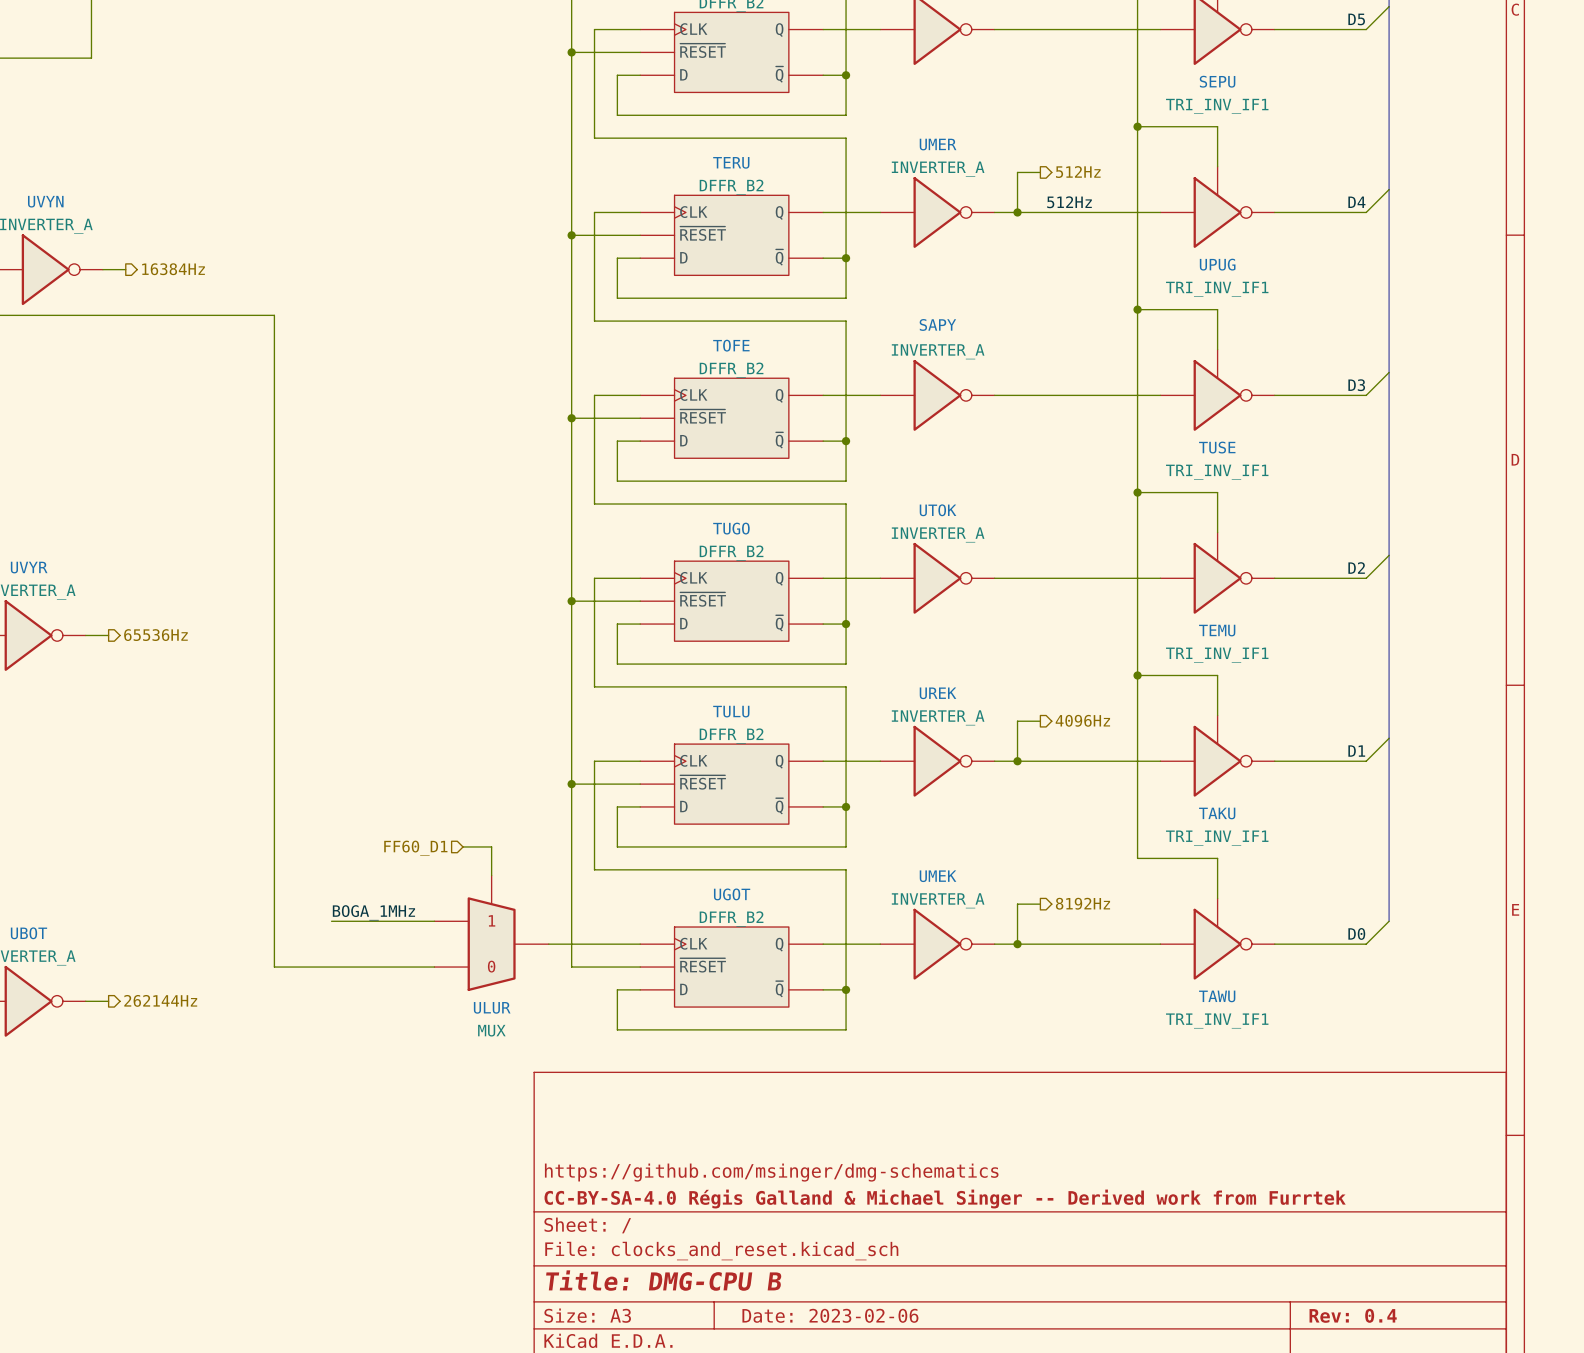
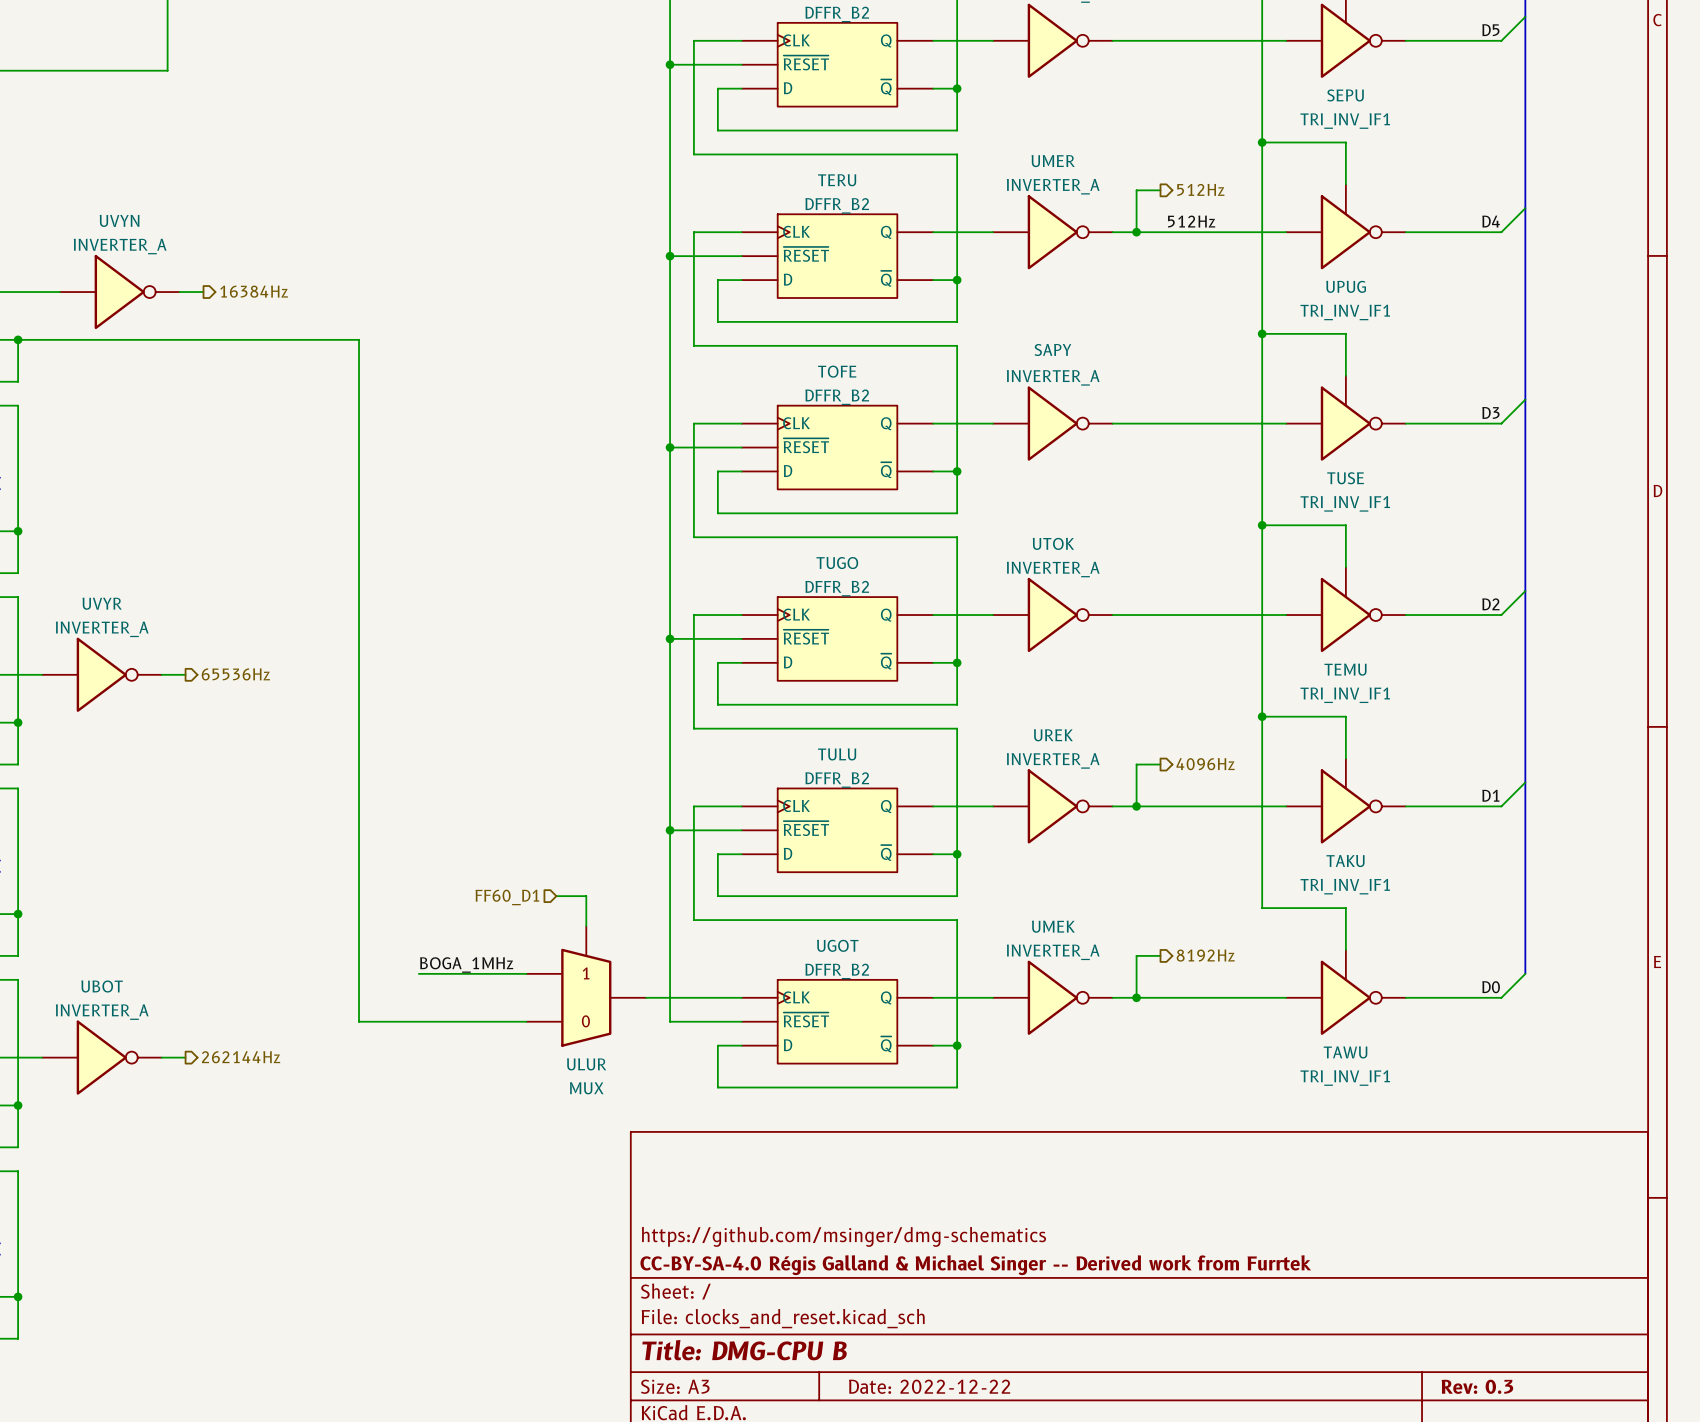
title block: Date: 2023-02-06 (830, 1315) -> Date: 2022-12-22 (929, 1386)
title block: Rev: 0.4 (1353, 1315) -> Rev: 0.3 (1477, 1386)

